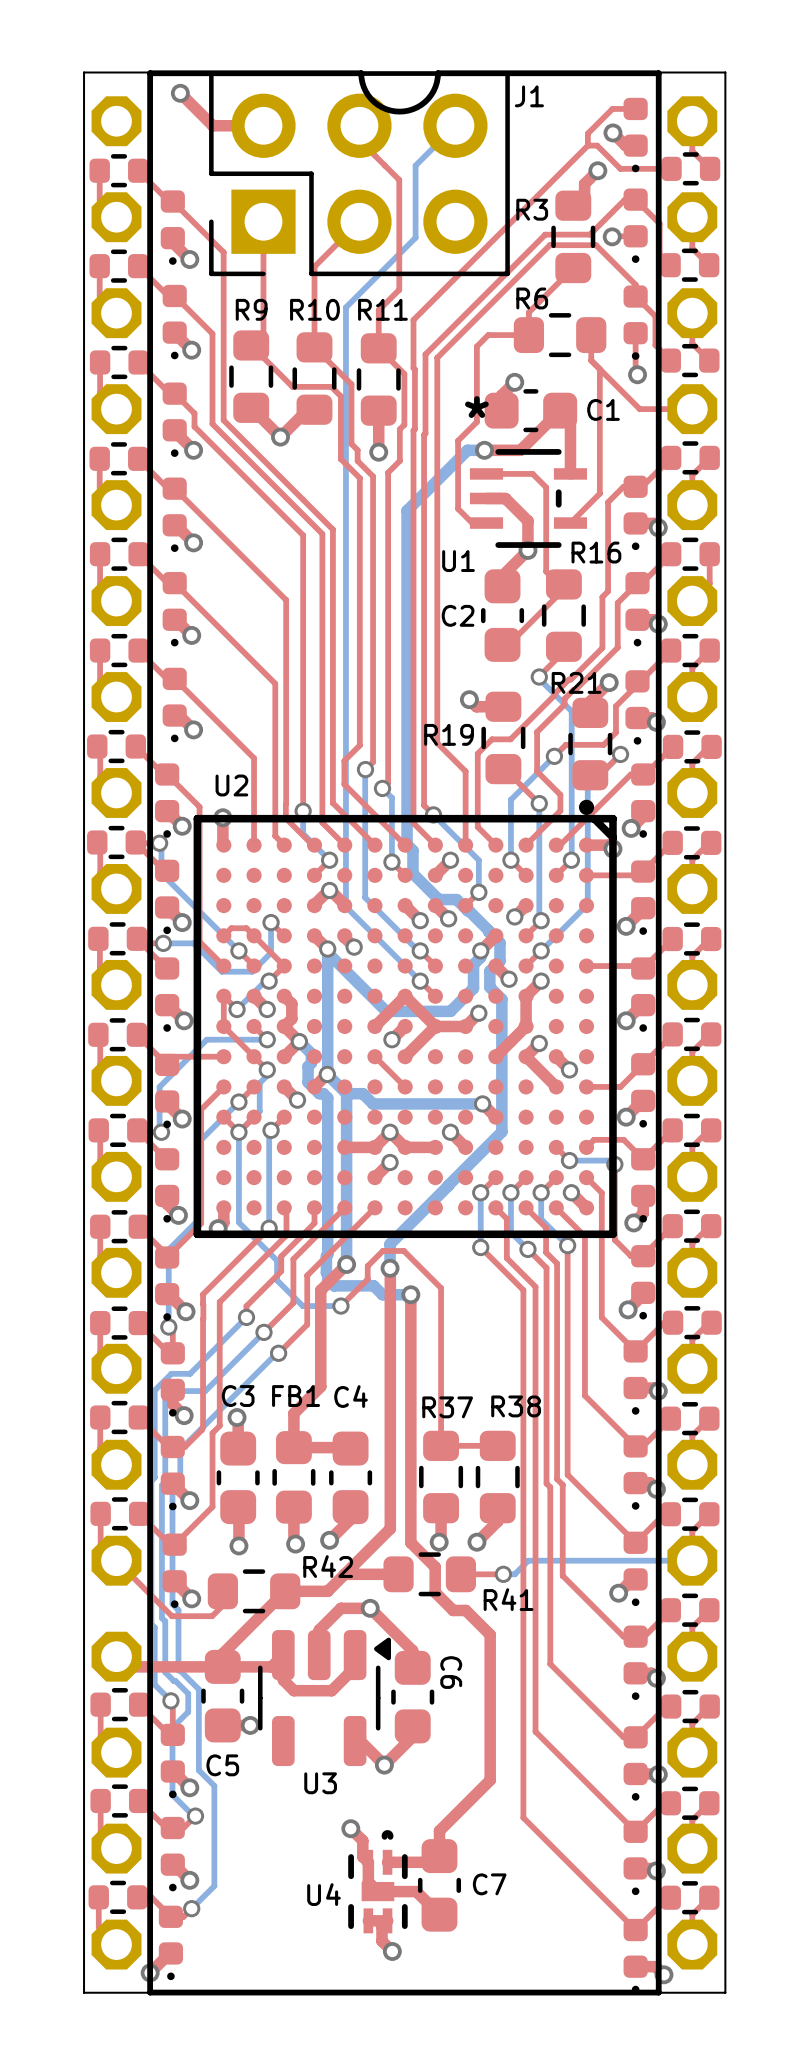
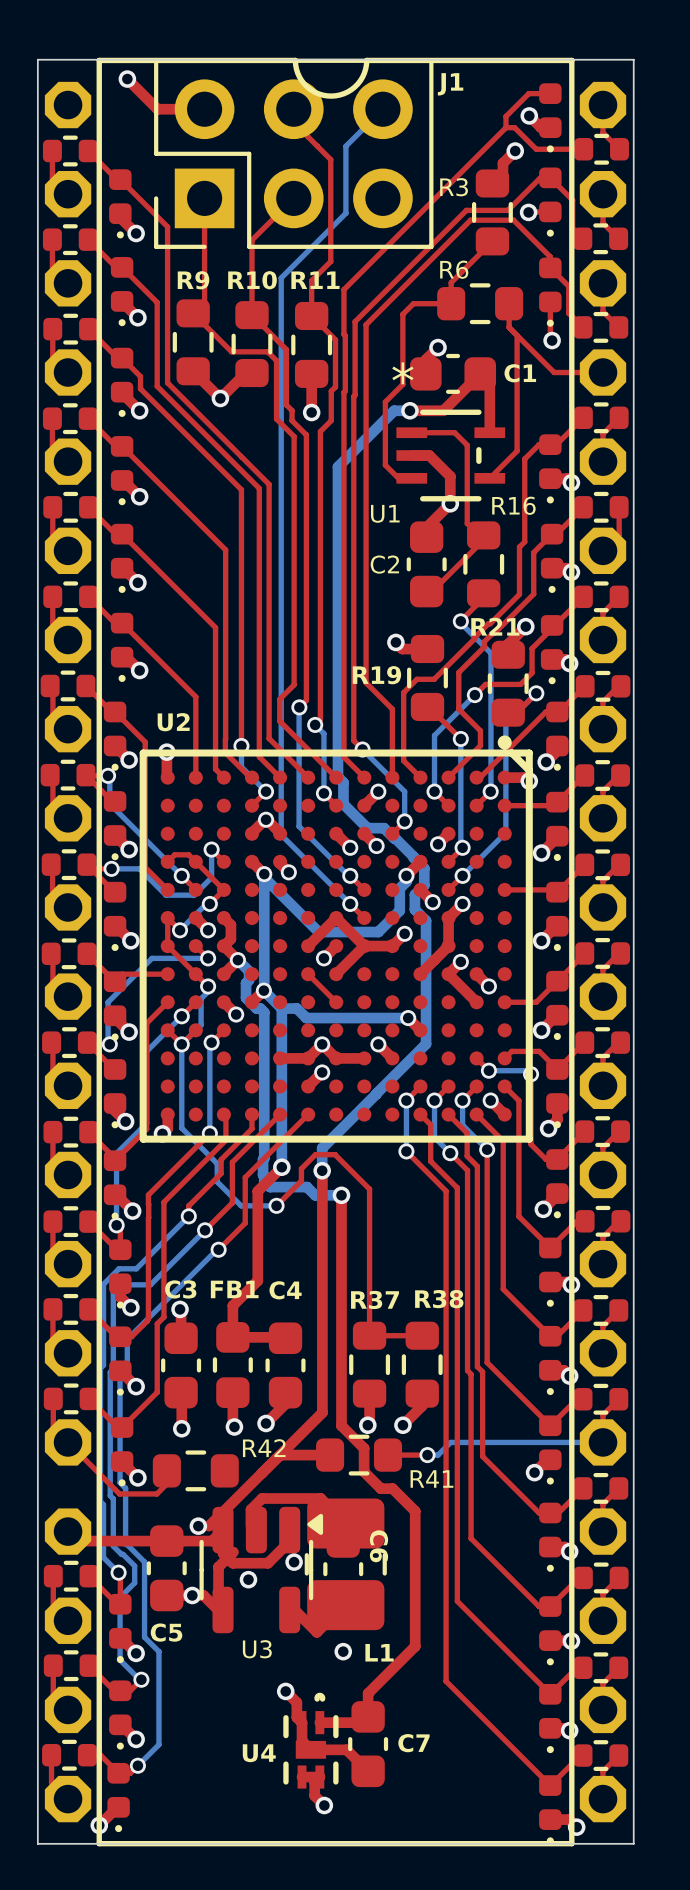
top track: (327, 1591) (285, 1591) (222, 1653) (222, 1666) -> (264, 1470) (208, 1526)
via: (370, 1608) -> none
top track: none -> (345, 1523) (320, 1498) (262, 1498) (251, 1509) (251, 1526)
via: none -> (198, 1526)
top track: (319, 1655) (319, 1630) (340, 1608) (370, 1608) (412, 1650) (412, 1667) -> none
top track: none -> (233, 1552) (218, 1567) (218, 1610) (203, 1595) (192, 1595)
via: none -> (294, 1562)
L1: none -> (345, 1564)
via: none -> (248, 1579)
via position: (384, 1765) -> (343, 1651)

